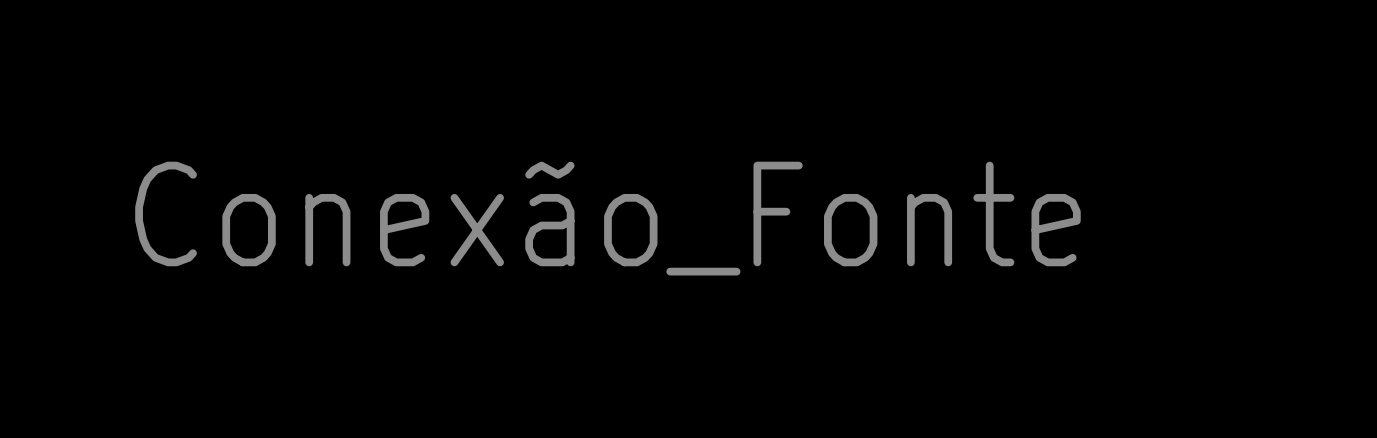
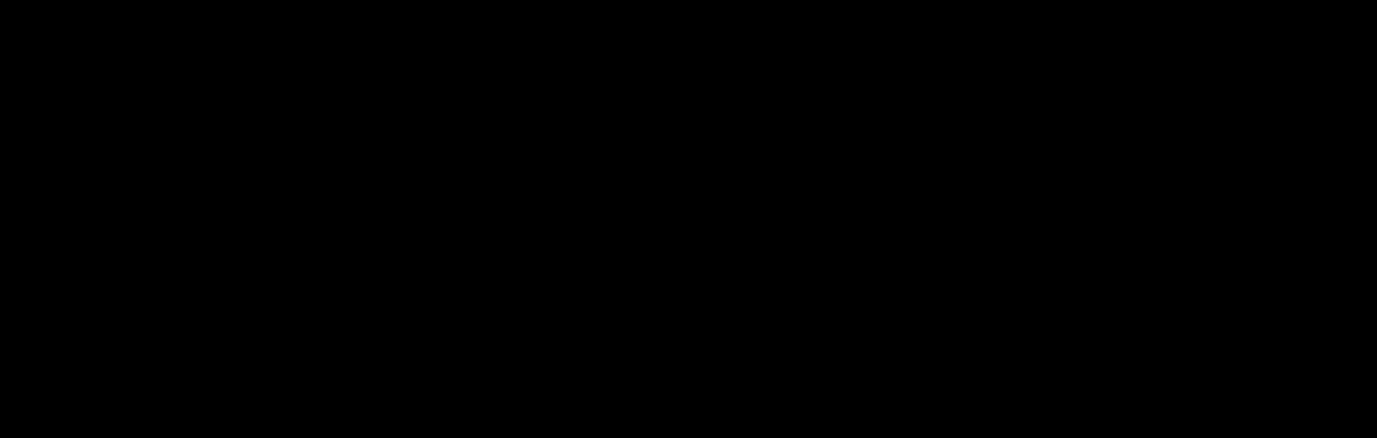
text: Conexão_Fonte (607, 218) -> none

